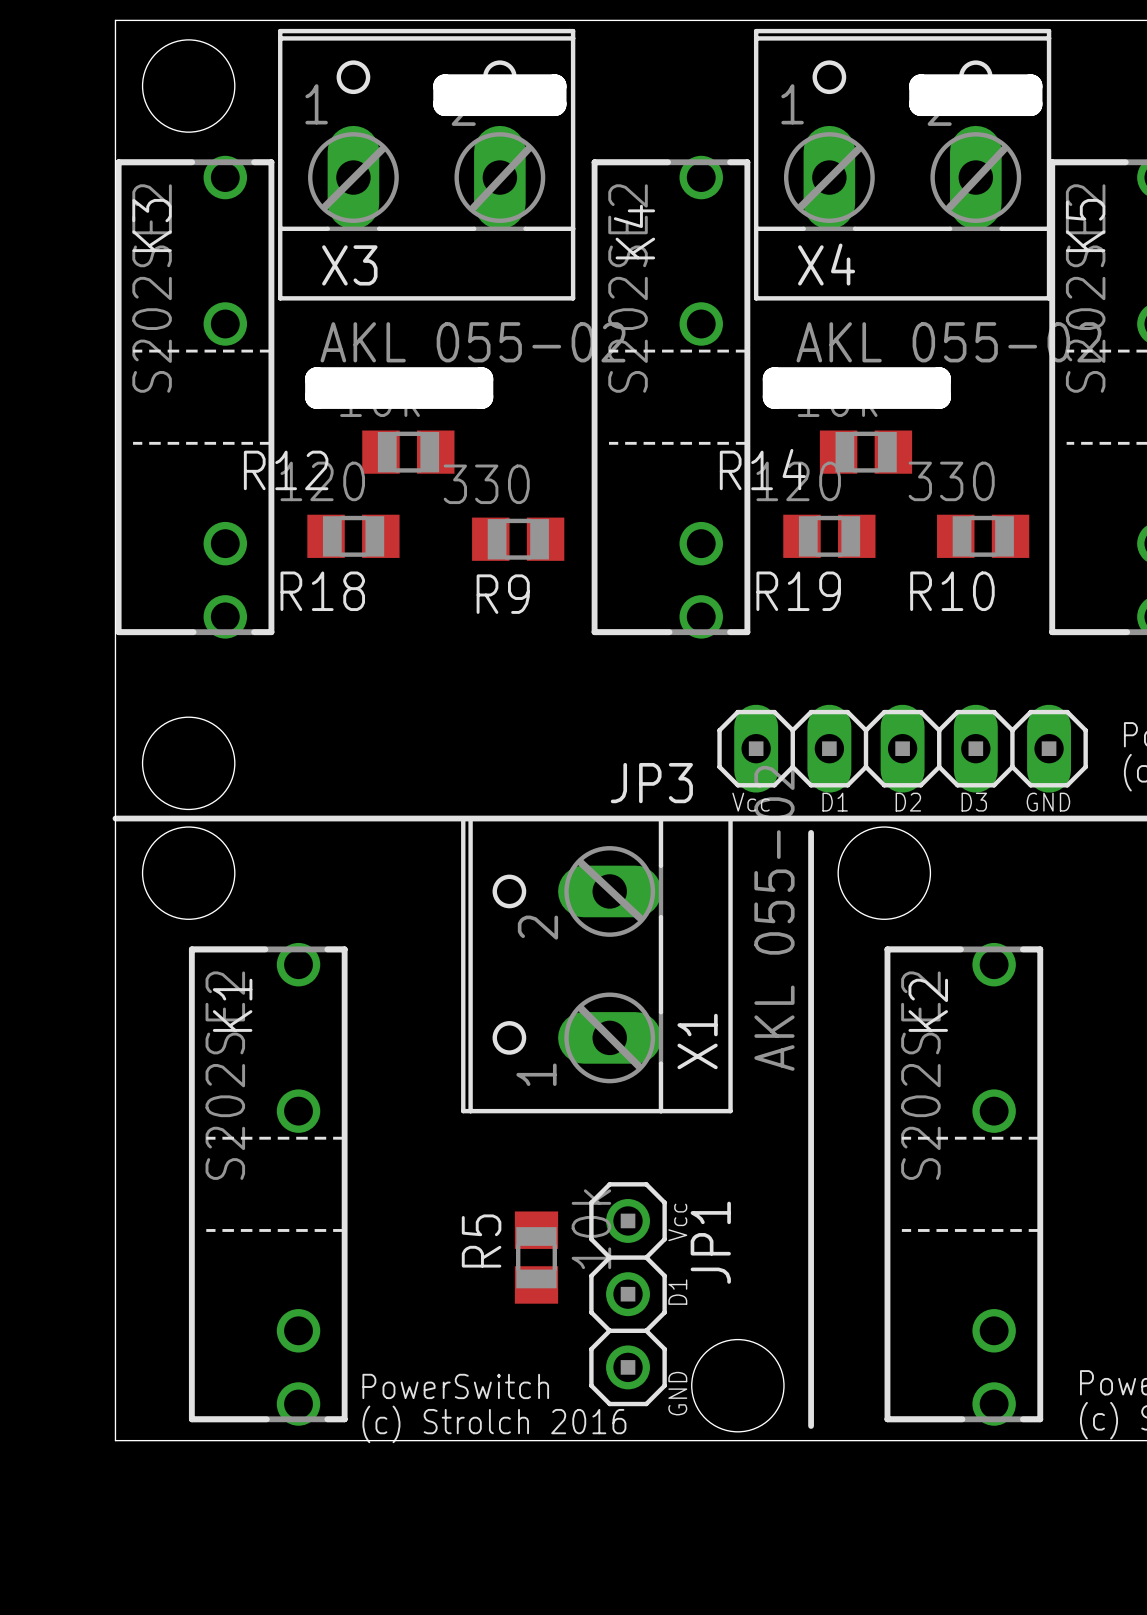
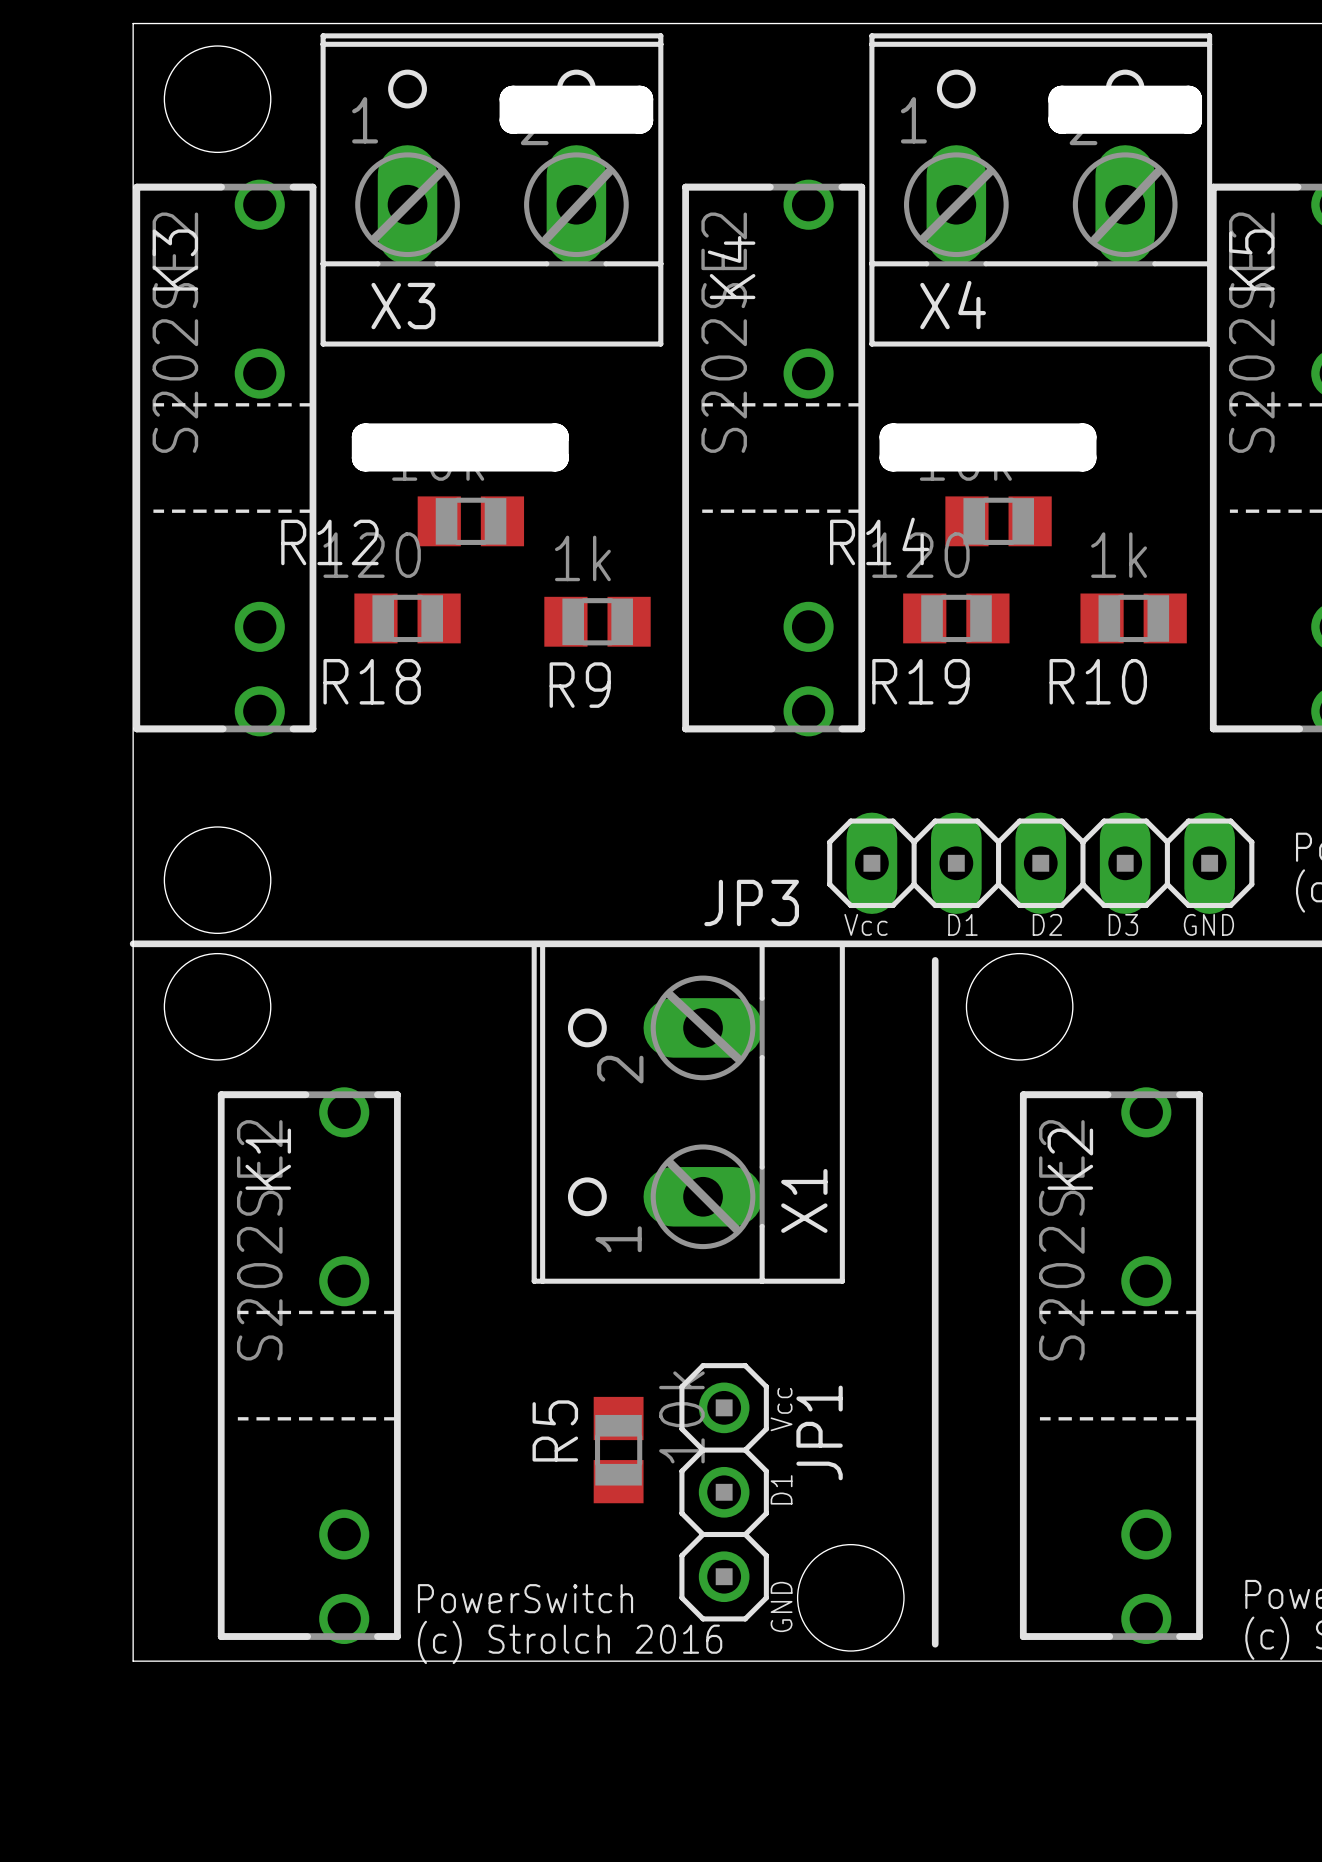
X3 value: AKL 055-02 (473, 342) -> none
X4 value: AKL 055-02 (948, 342) -> none
R10 value: 330 (951, 481) -> 1k (1119, 555)
R9 value: 330 (486, 484) -> 1k (582, 558)
X1 value: AKL 055-02 (774, 918) -> none

